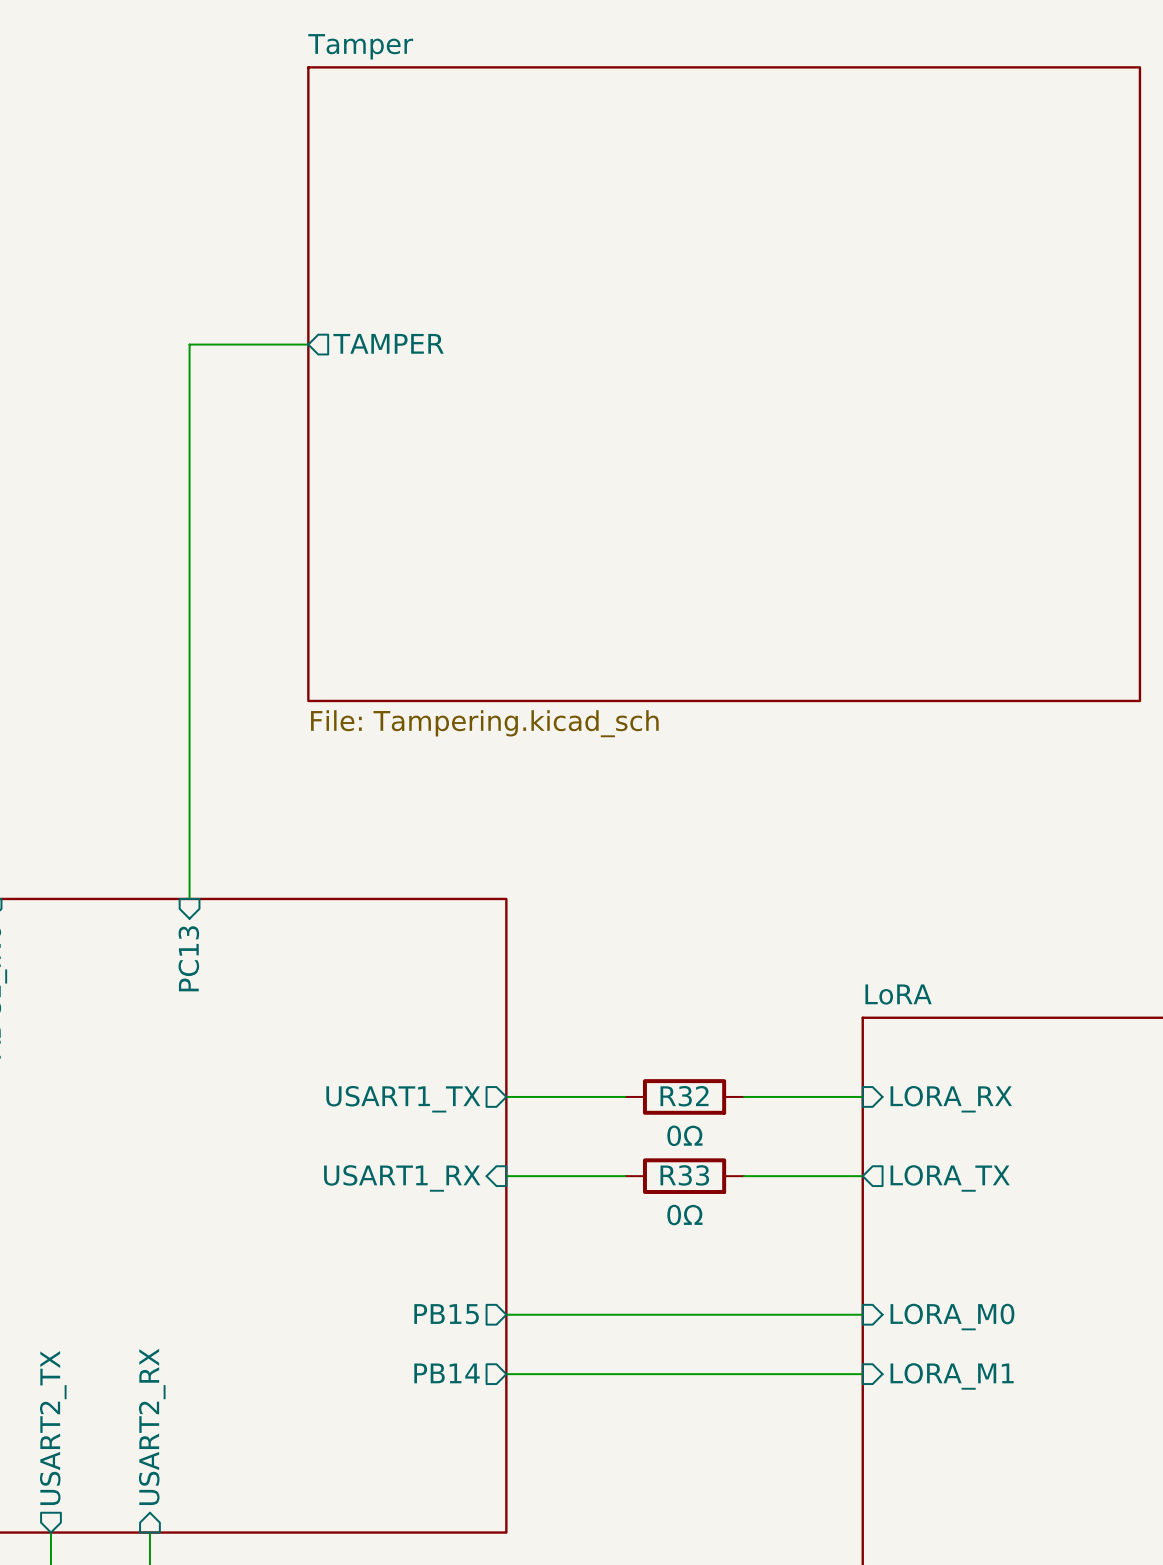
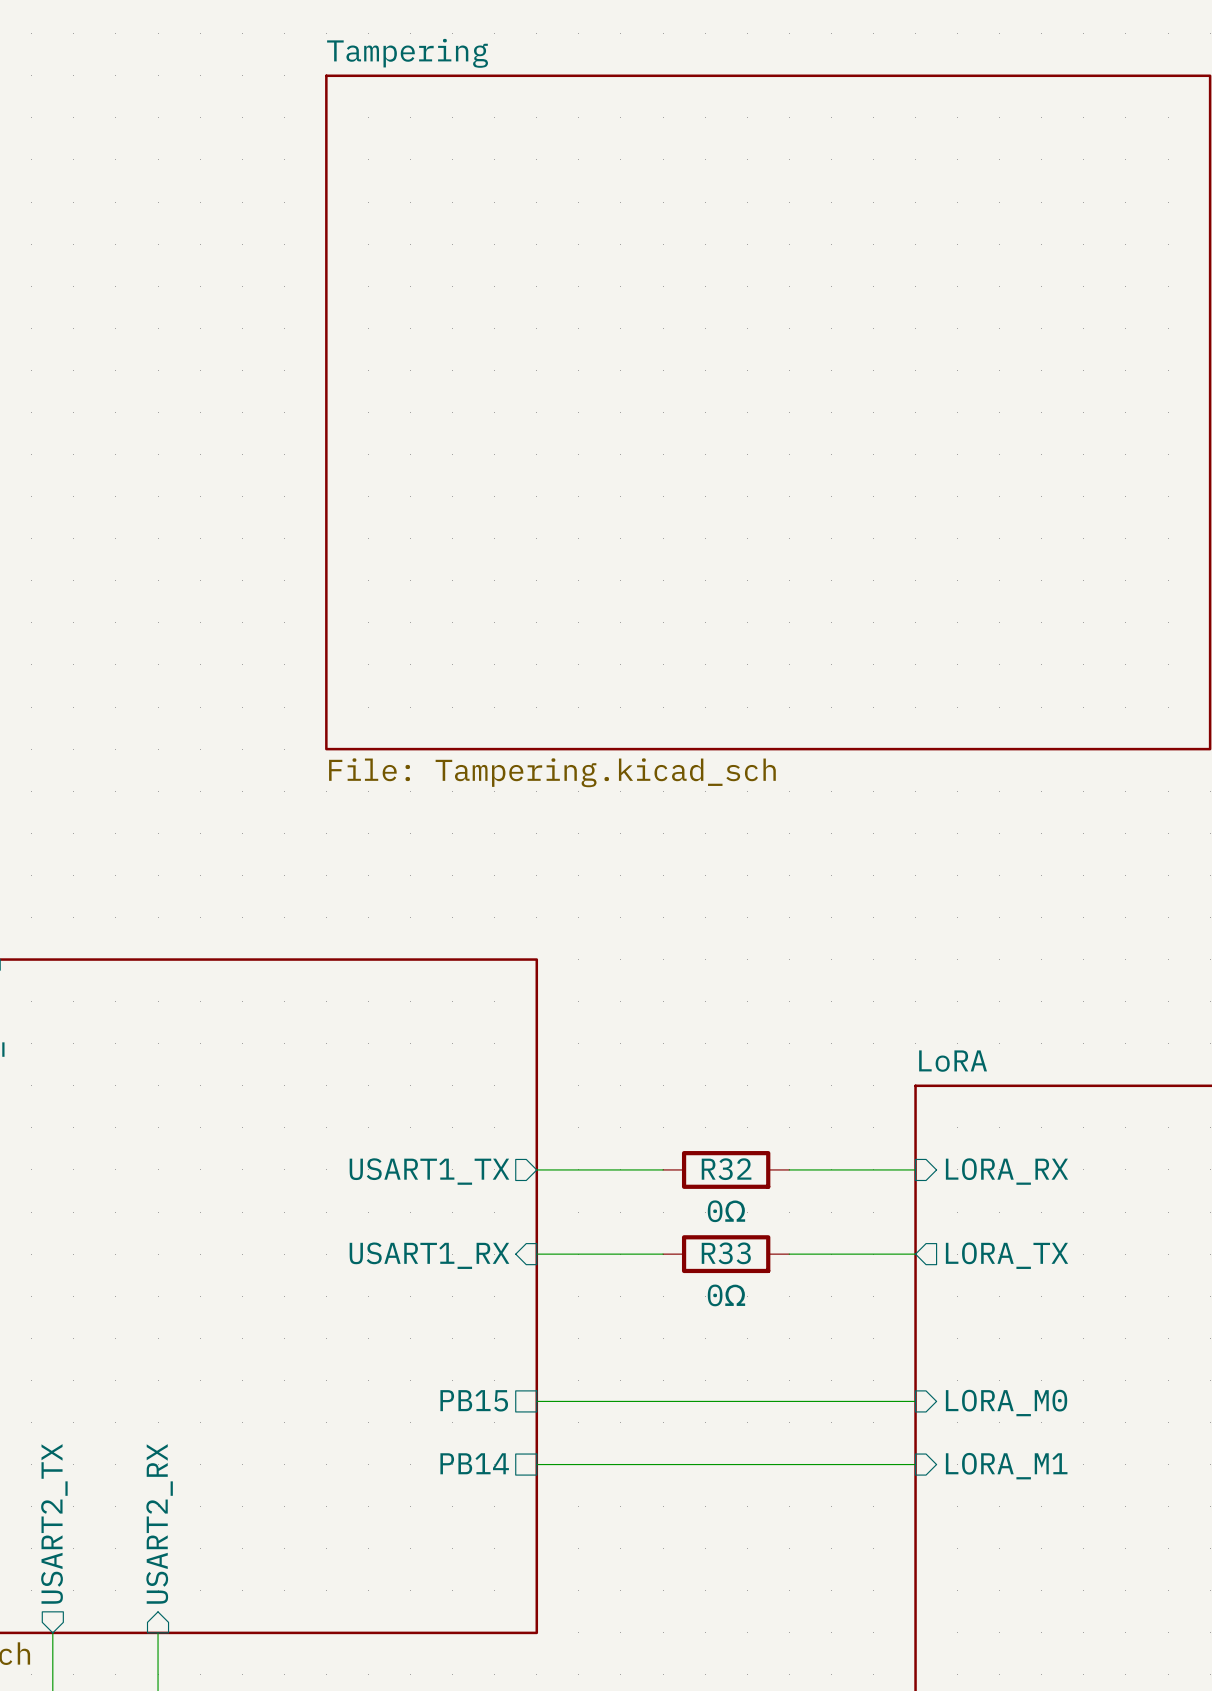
sheet Tamper name: Tamper (360, 46) -> Tampering (407, 53)
sheet pin: TAMPER (388, 343) -> none
wire: (308, 344) (189, 344) (189, 898) -> none
sheet pin: PC13 (188, 958) -> none
sheet pin shape: output (446, 1314) -> passive (474, 1400)
sheet pin shape: output (447, 1373) -> passive (474, 1463)

